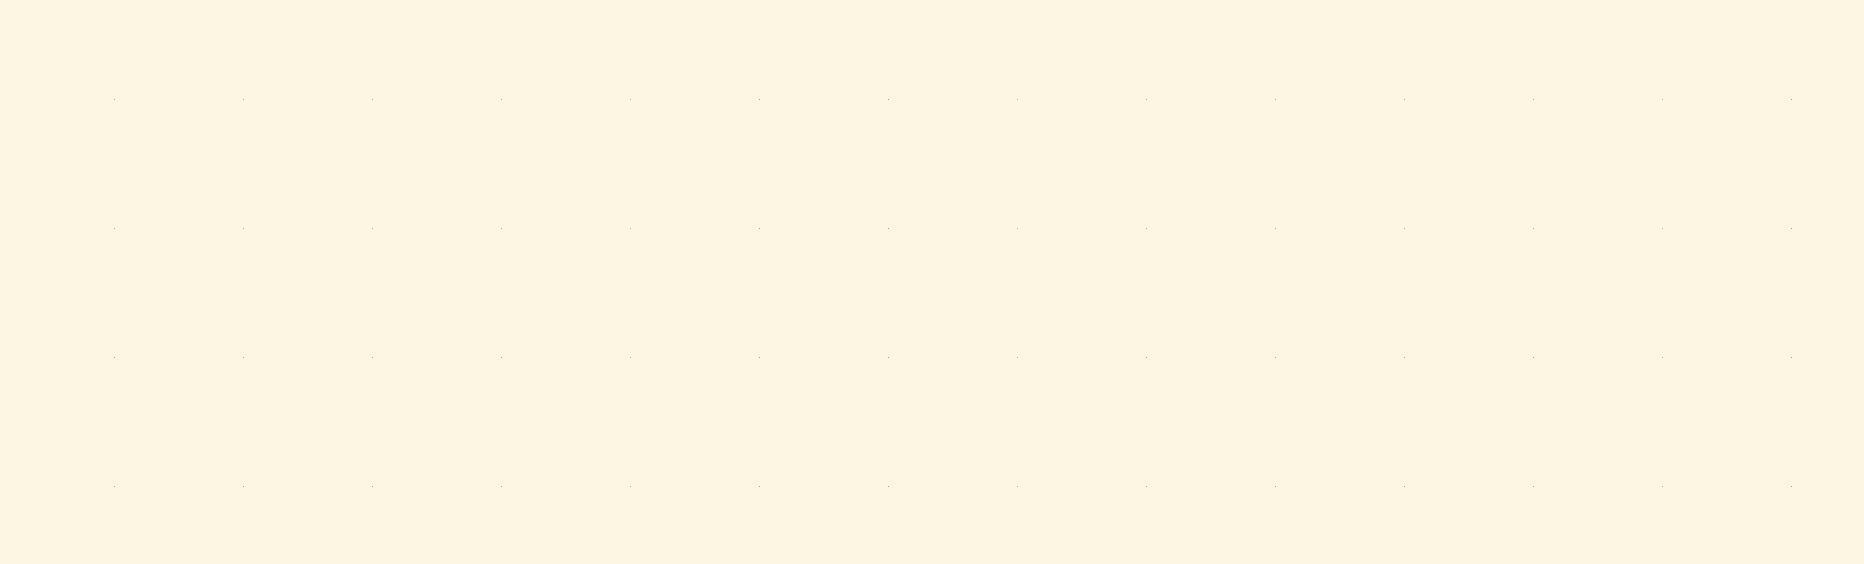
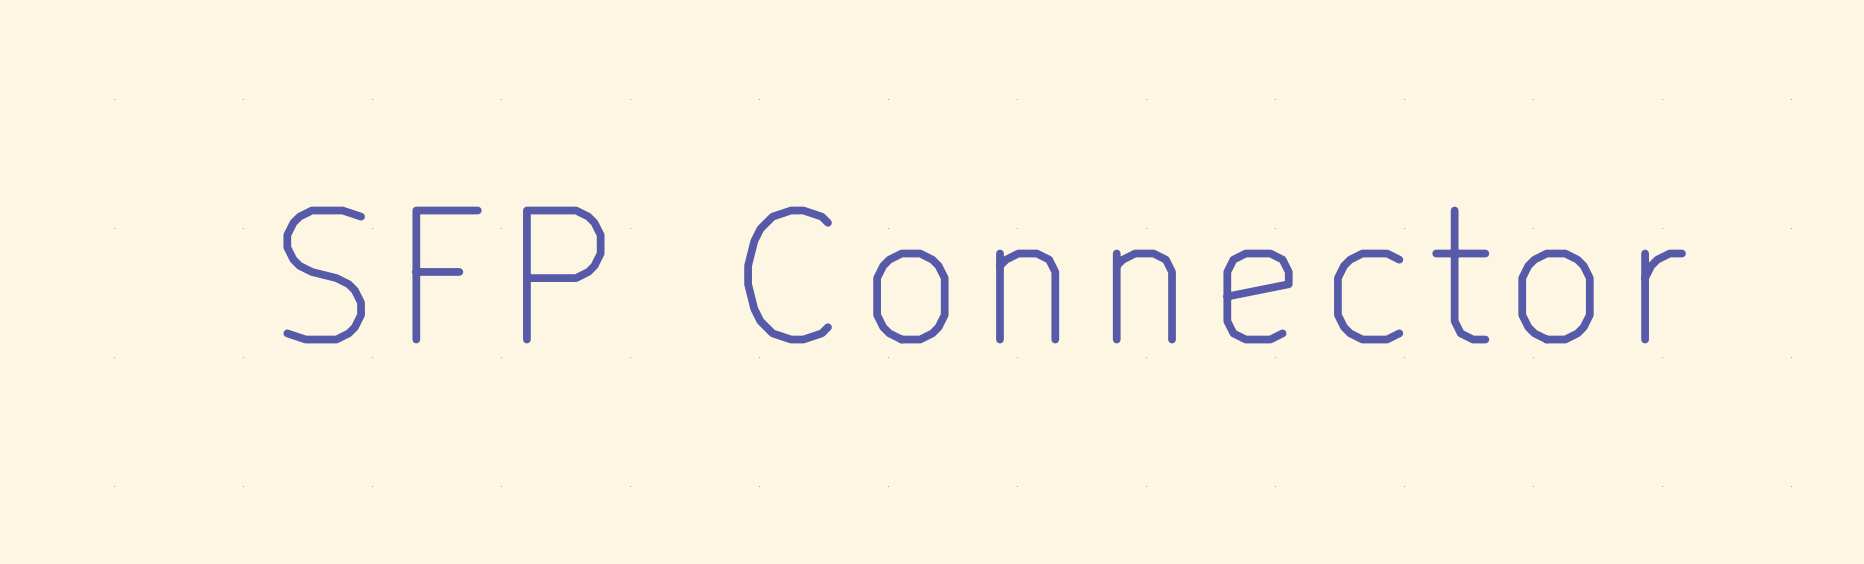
text: none -> SFP Connector (984, 275)

